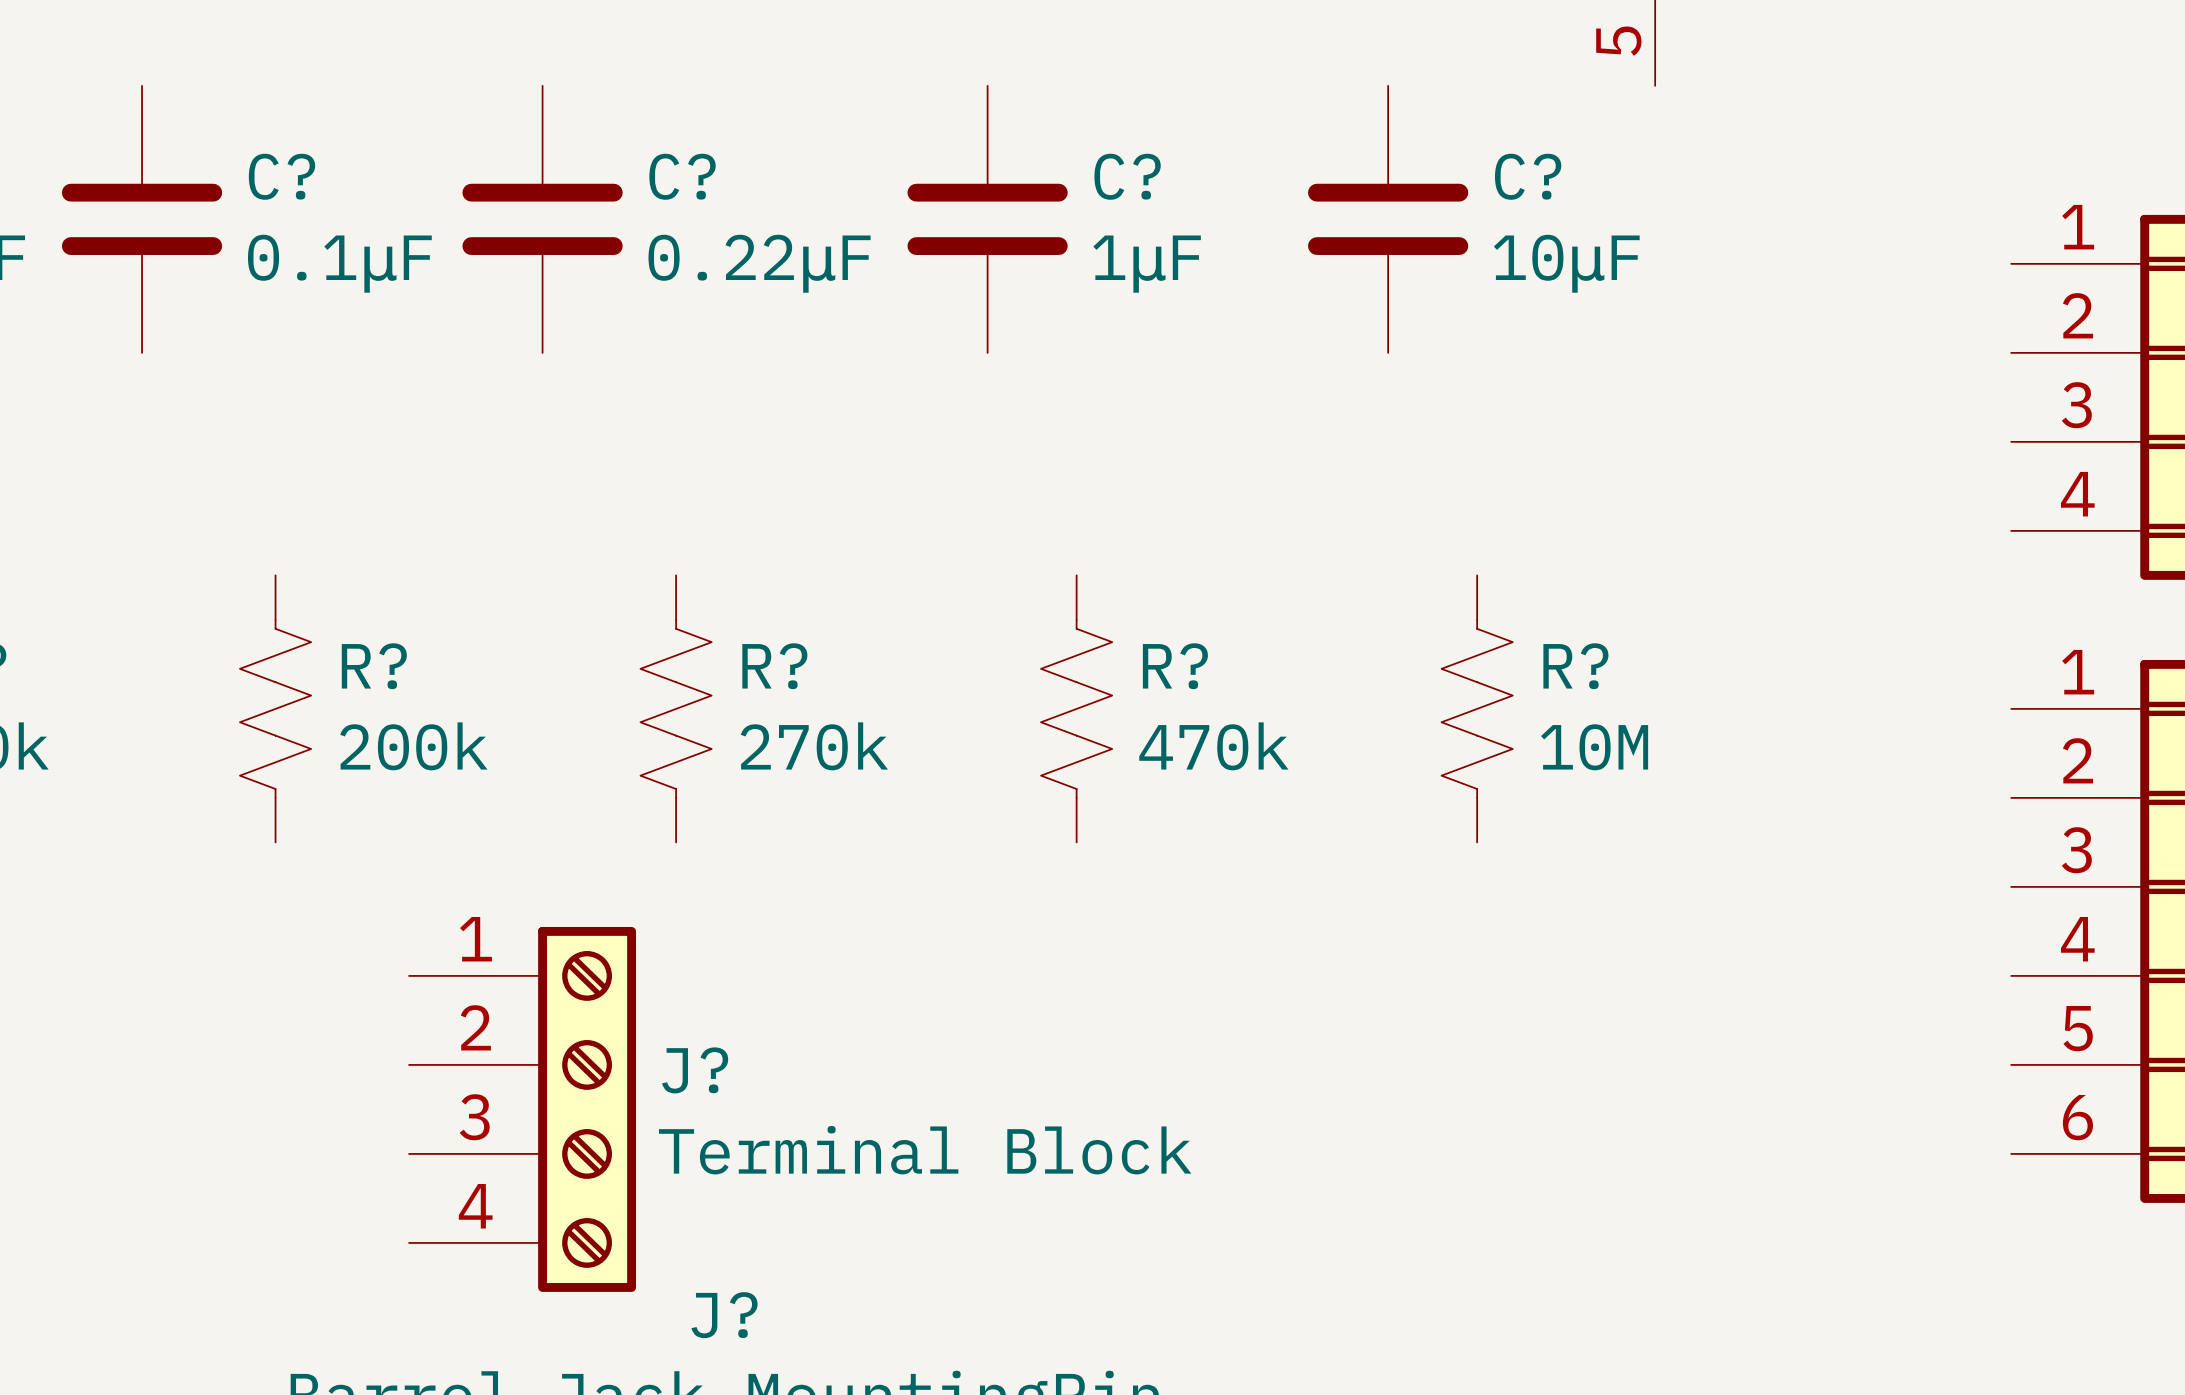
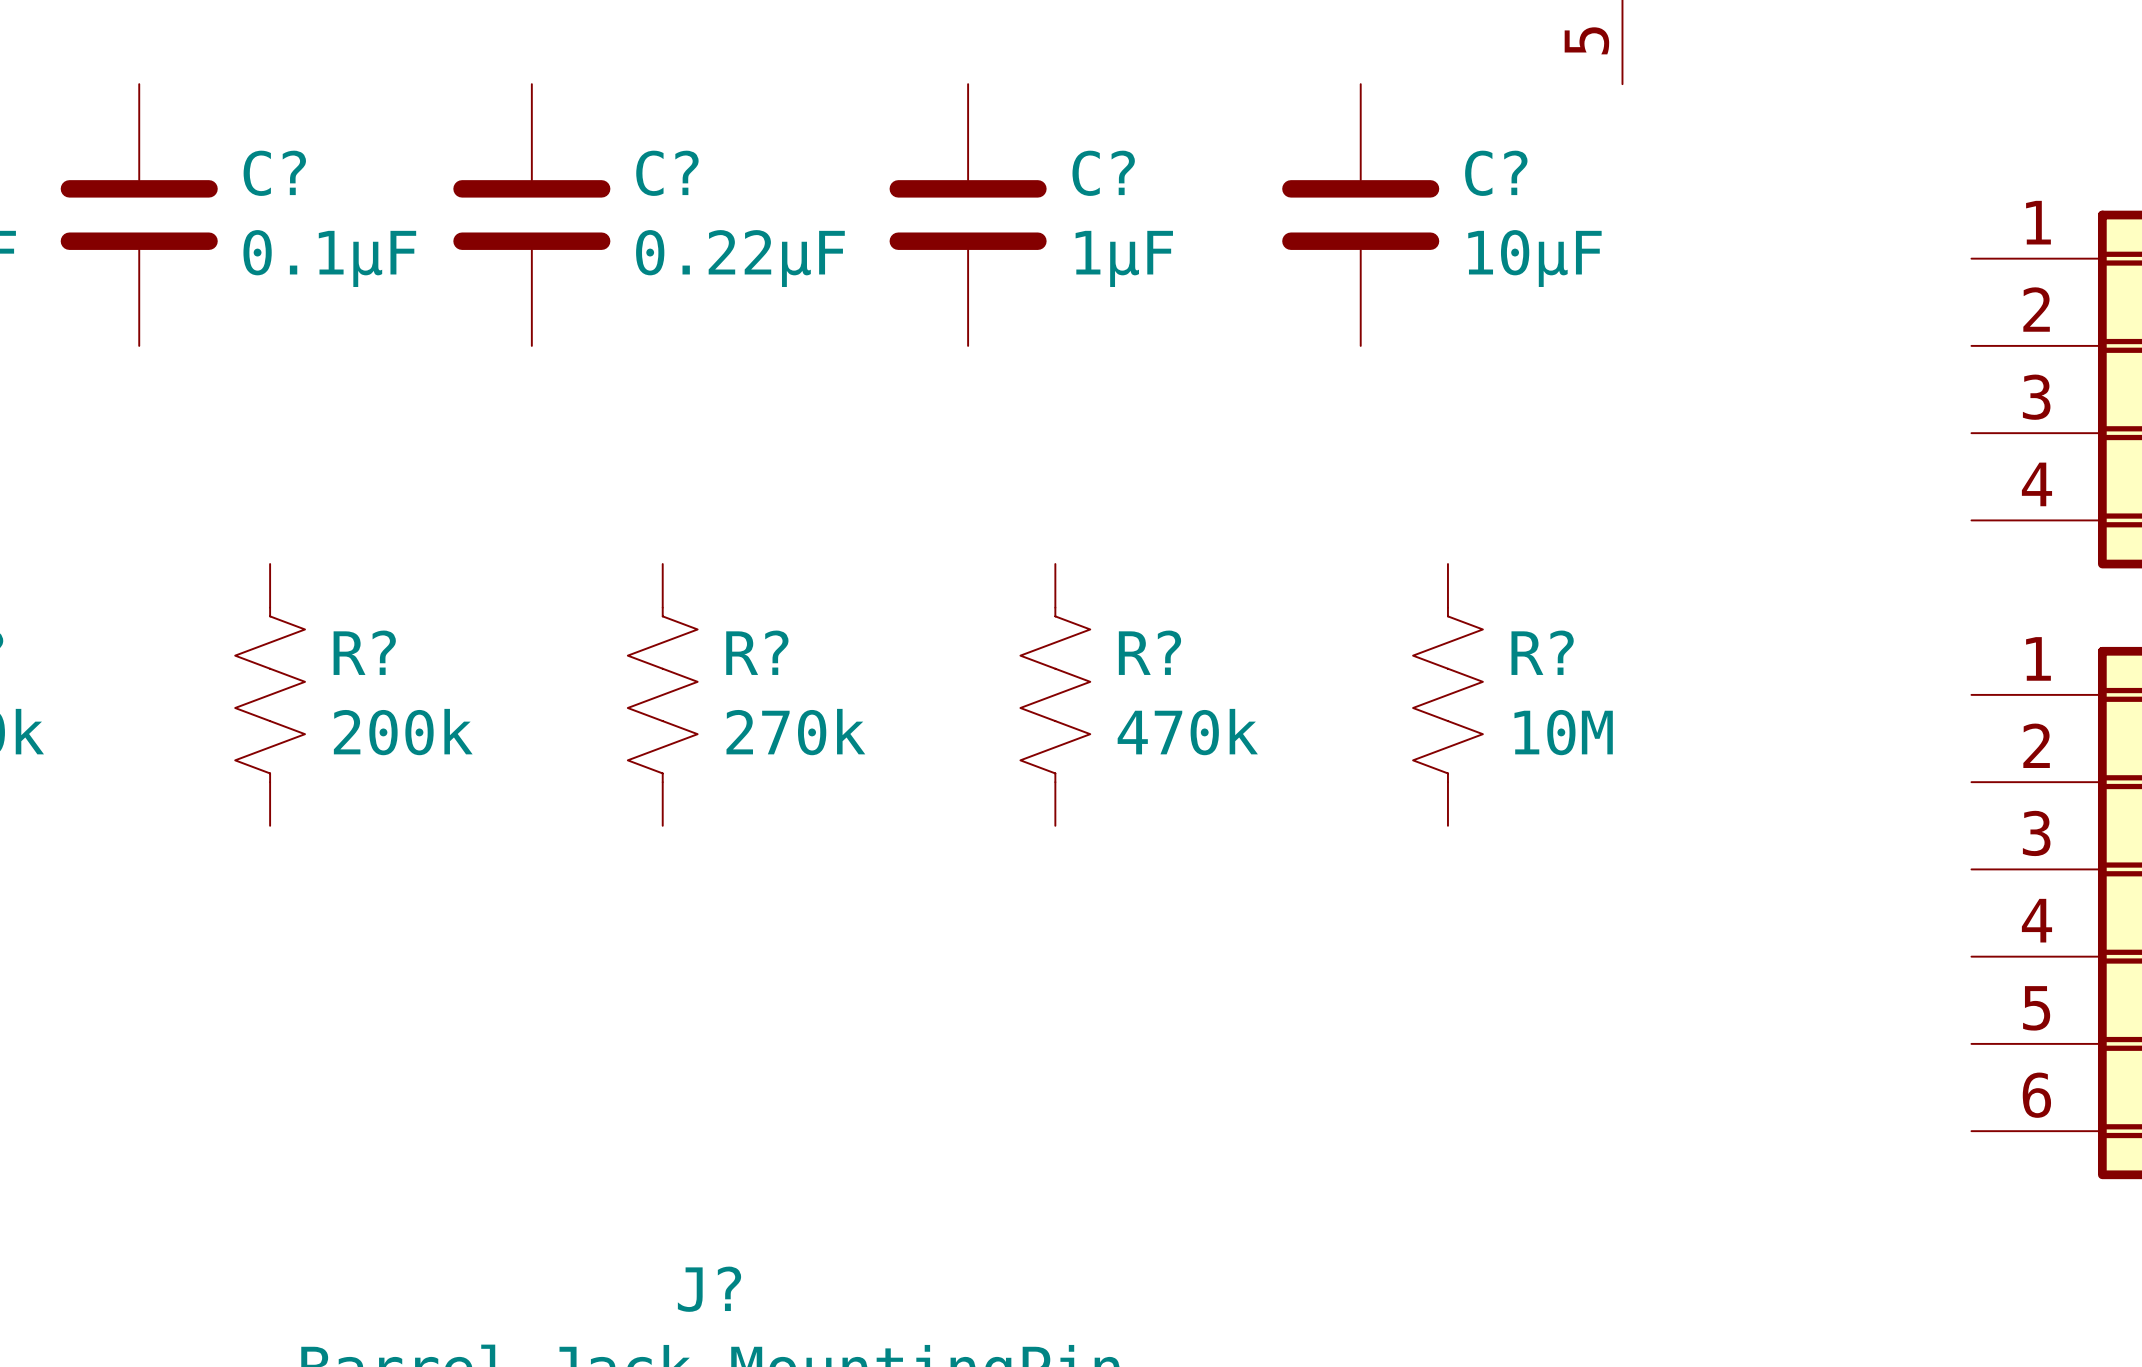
J?: Terminal Block (522, 1109) -> none

